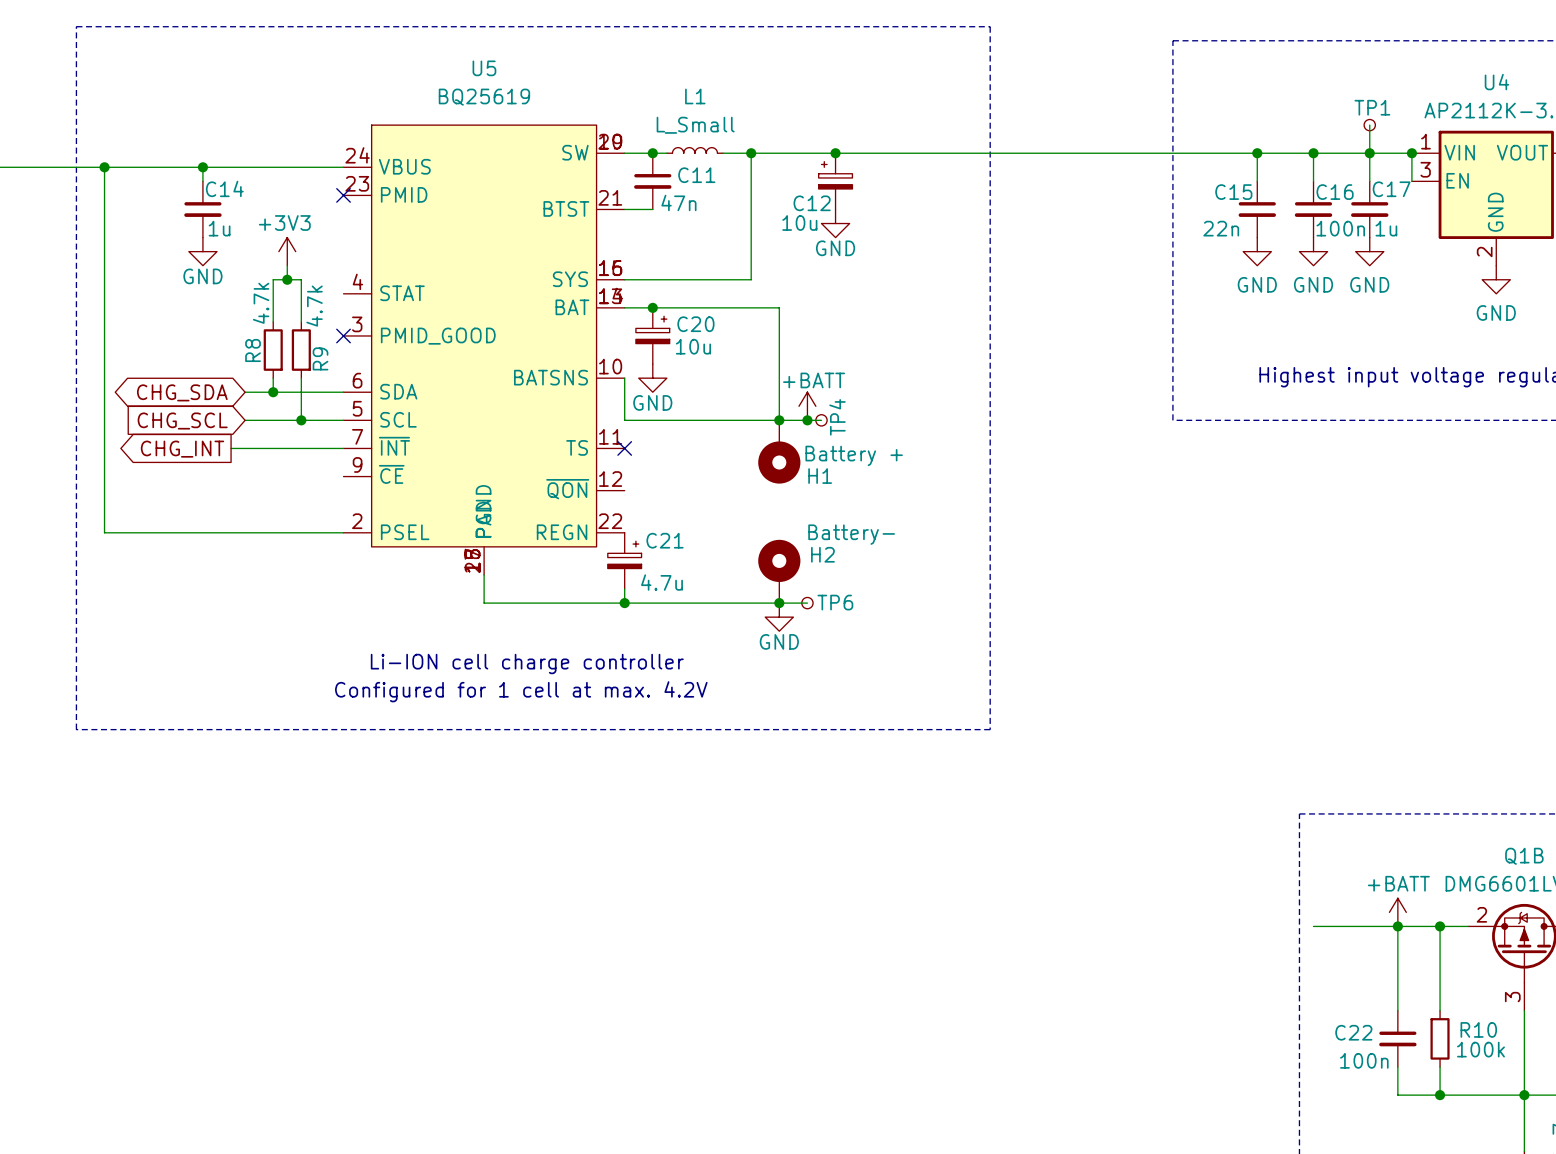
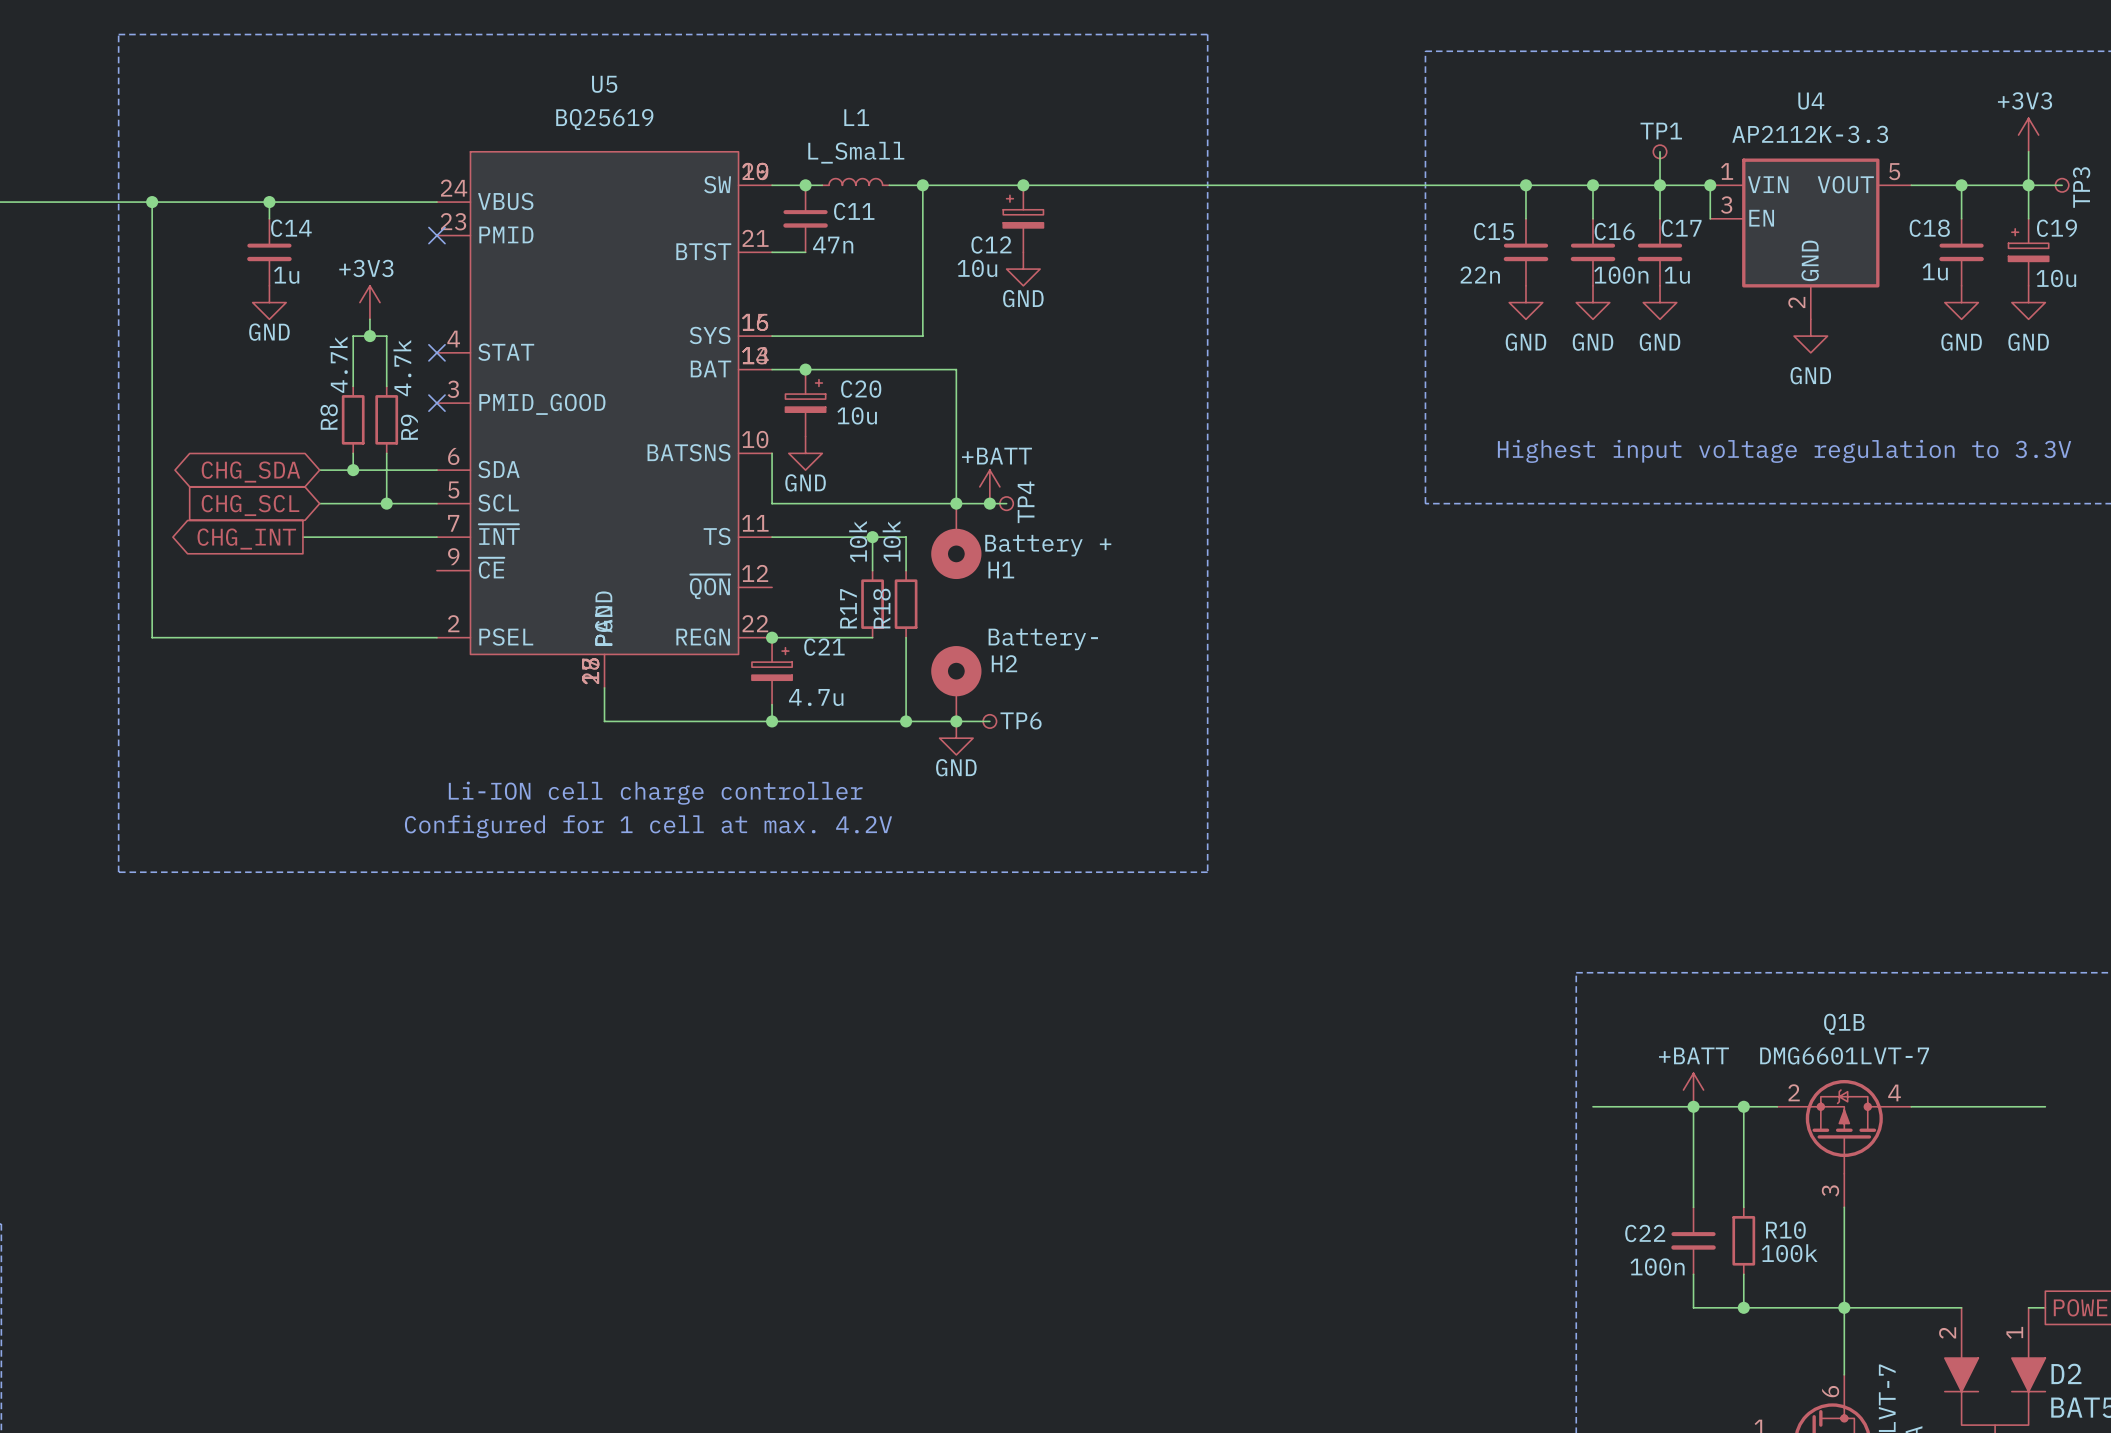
no-connect mark: none -> (436, 352)
wire: none -> (772, 537) (906, 537) (906, 570)
no-connect mark: (624, 448) -> none
wire: none -> (872, 537) (872, 570)
junction: none -> (872, 537)
R17: none -> 10k (872, 604)
R18: none -> 10k (906, 604)
wire: none -> (772, 637) (872, 637)
junction: none -> (772, 637)
wire: none -> (906, 637) (906, 721)
junction: none -> (906, 721)

